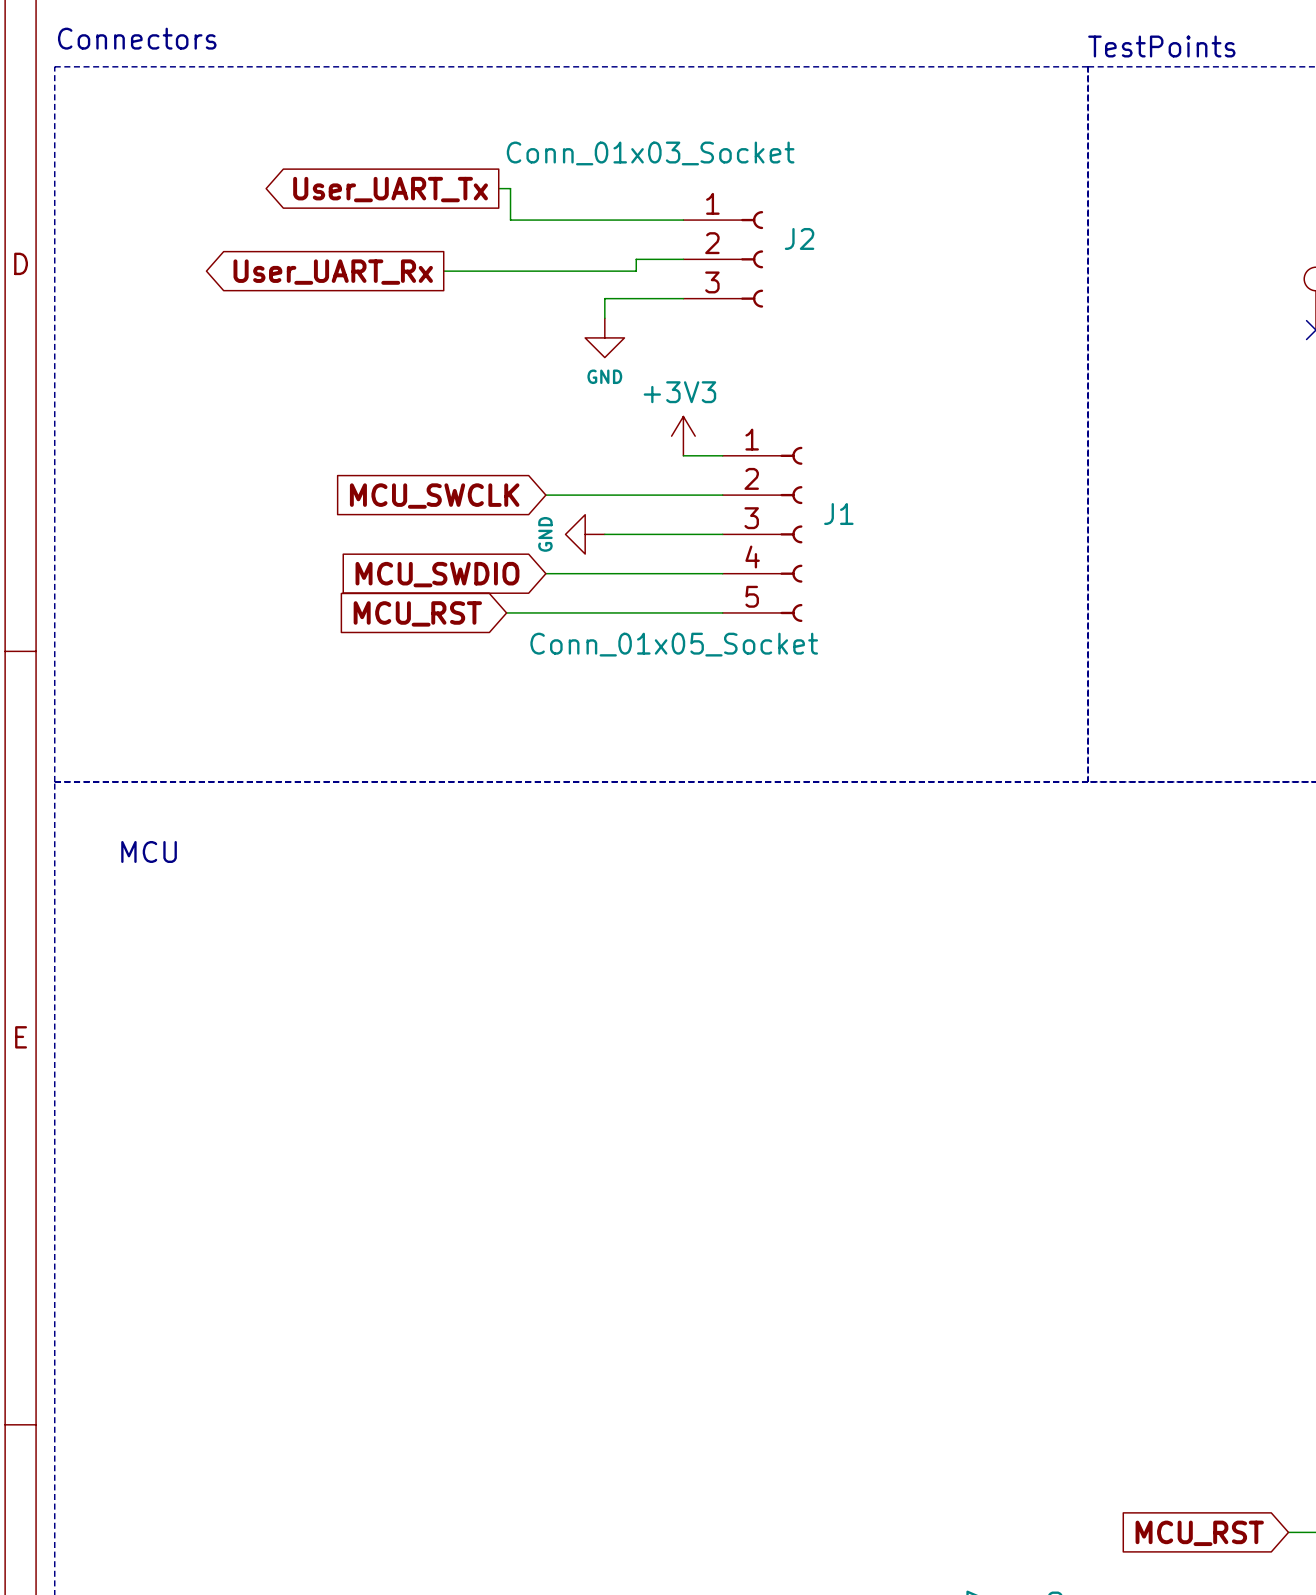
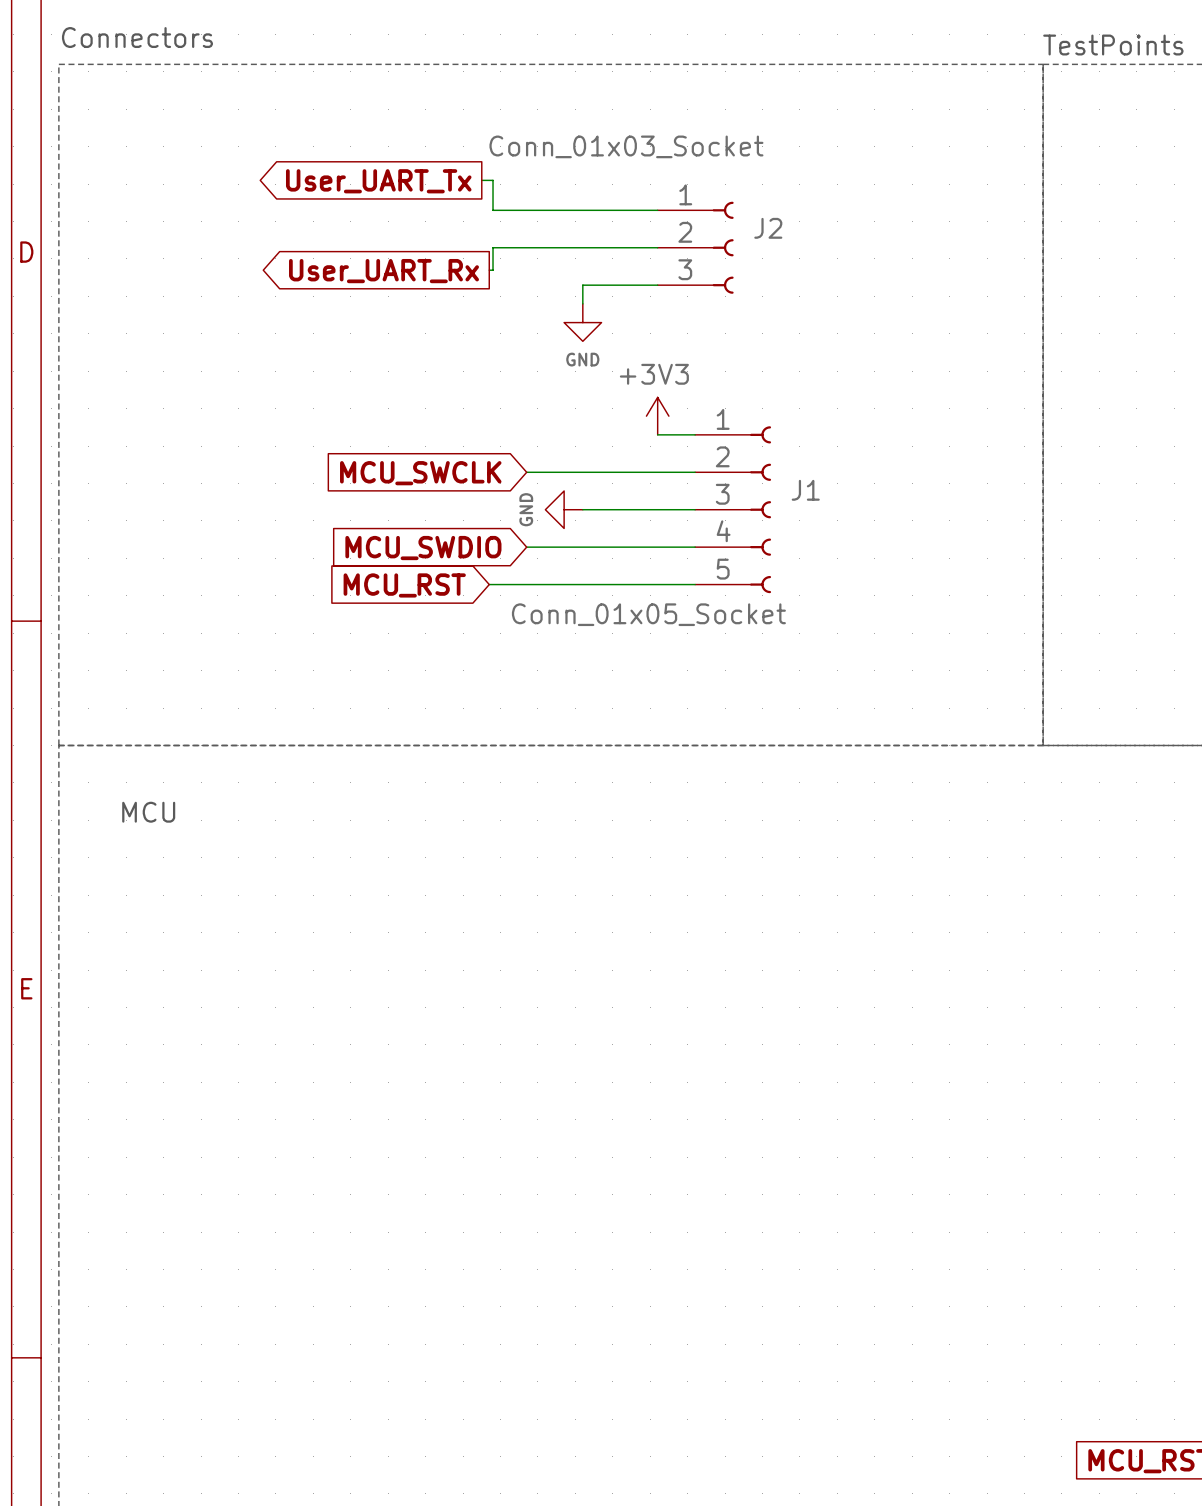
wire: (636, 259) (636, 271) (443, 271) -> (612, 247) (493, 247) (493, 270) (489, 270)
global label position: User_UART_Rx (333, 272) -> User_UART_Rx (384, 271)

